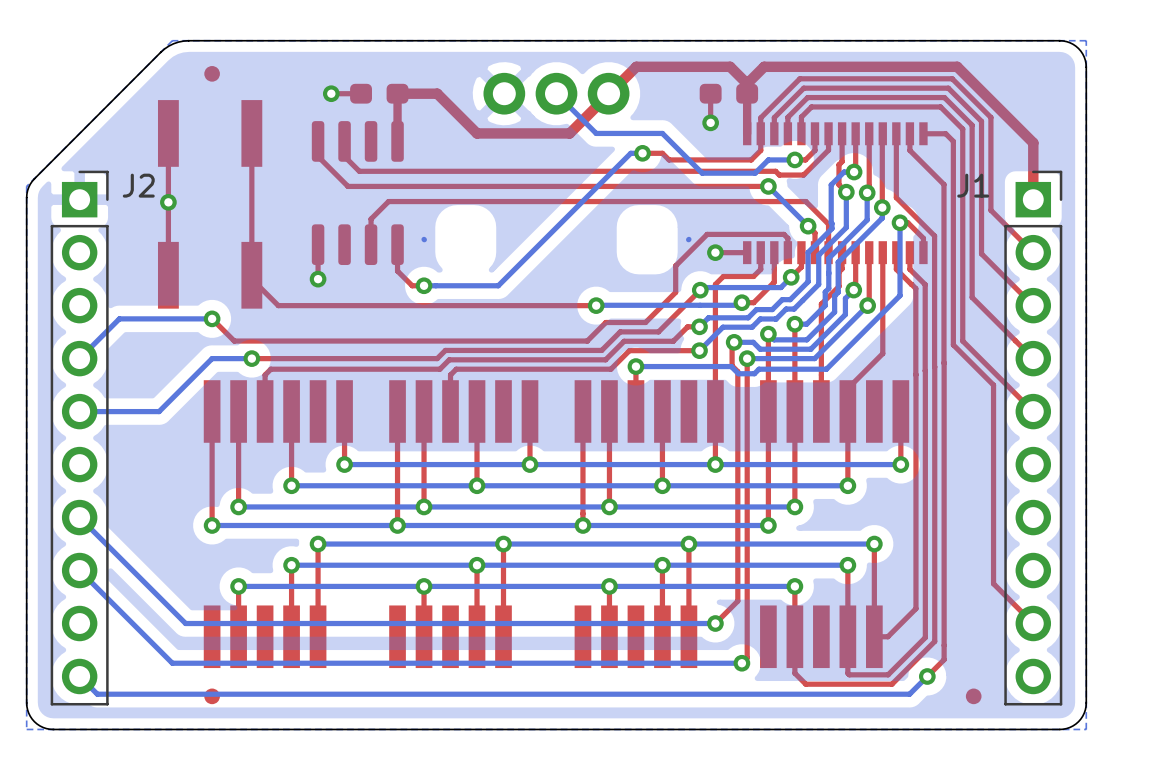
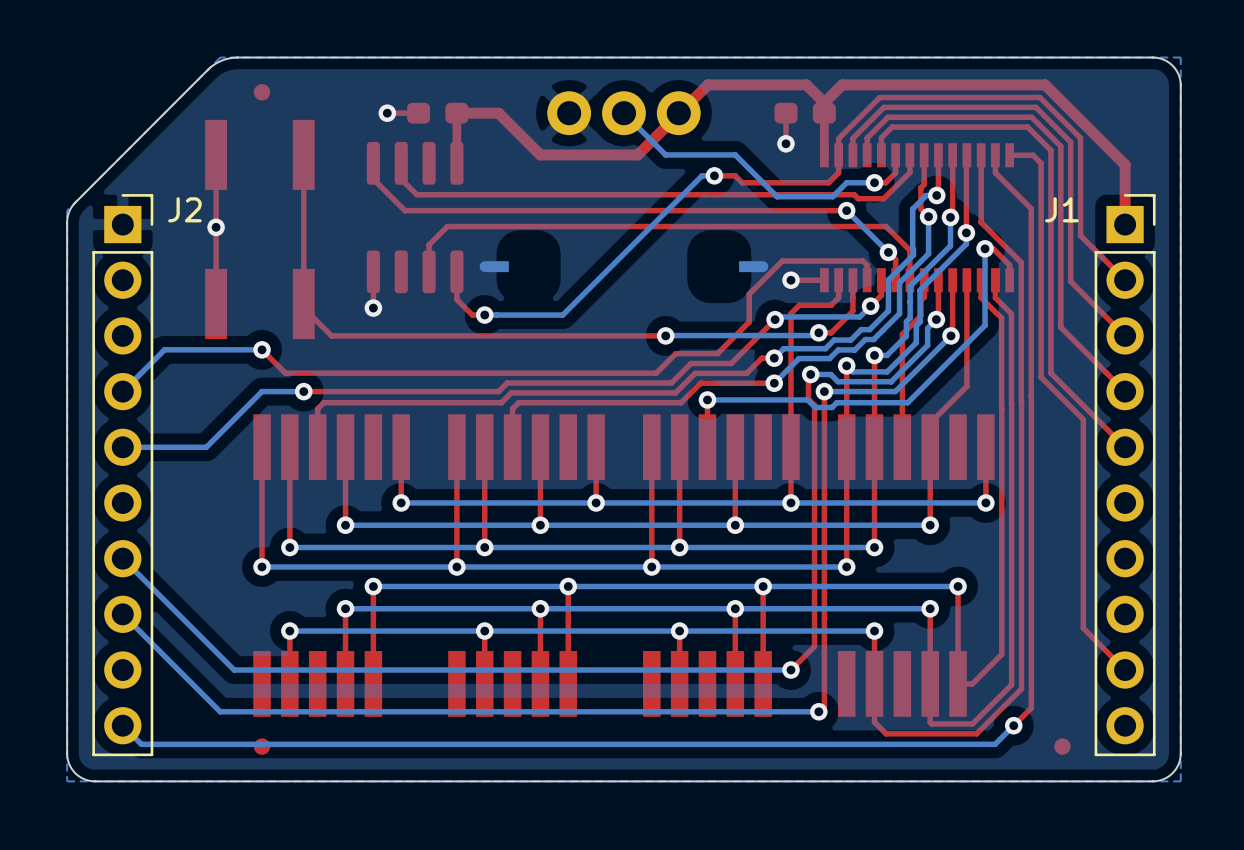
bottom track: none -> (528, 266) (485, 266)
bottom track: none -> (762, 266) (719, 266)

